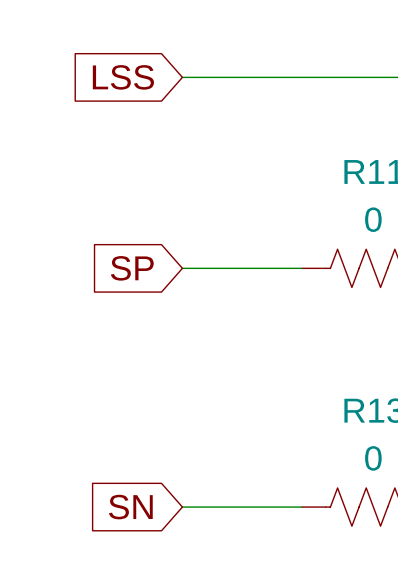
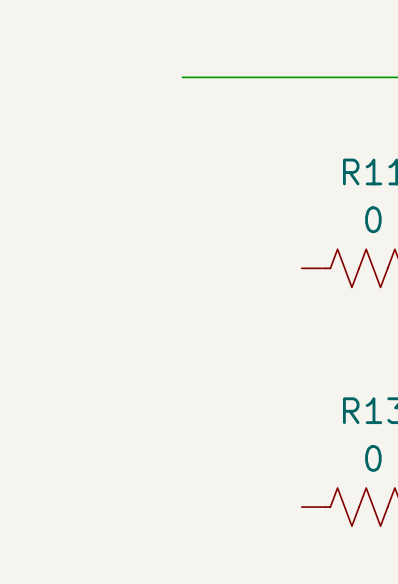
global label: LSS (123, 77) -> none
global label: SP (132, 268) -> none
wire: (182, 268) (301, 268) -> none
global label: SN (130, 507) -> none
wire: (182, 507) (301, 507) -> none

